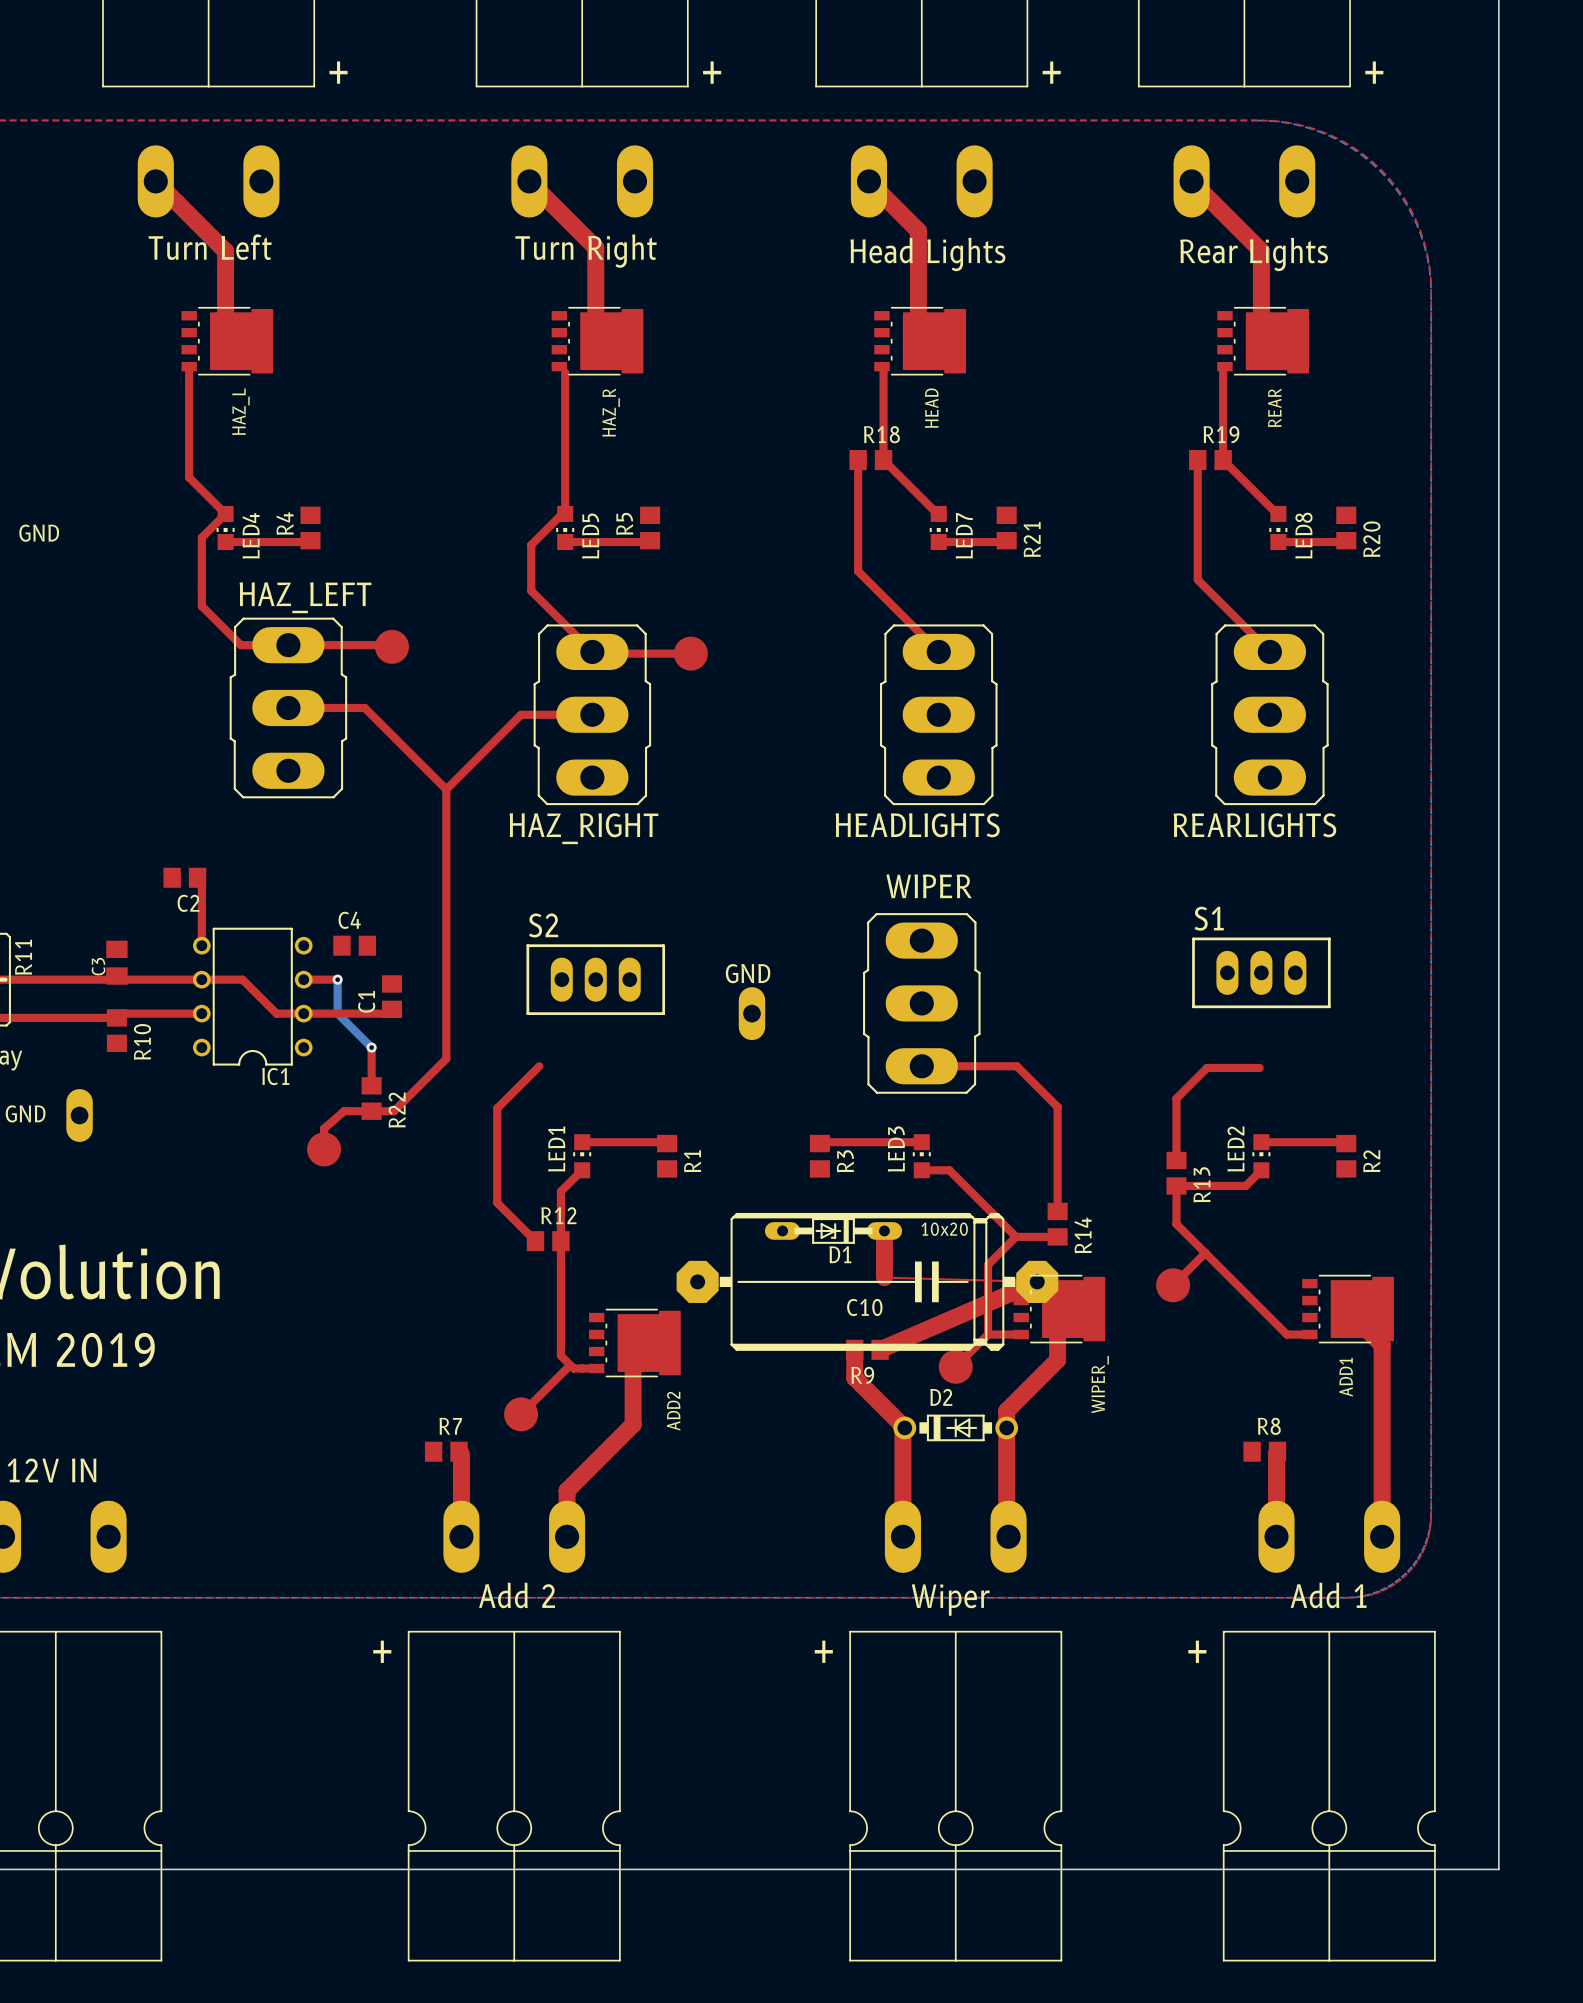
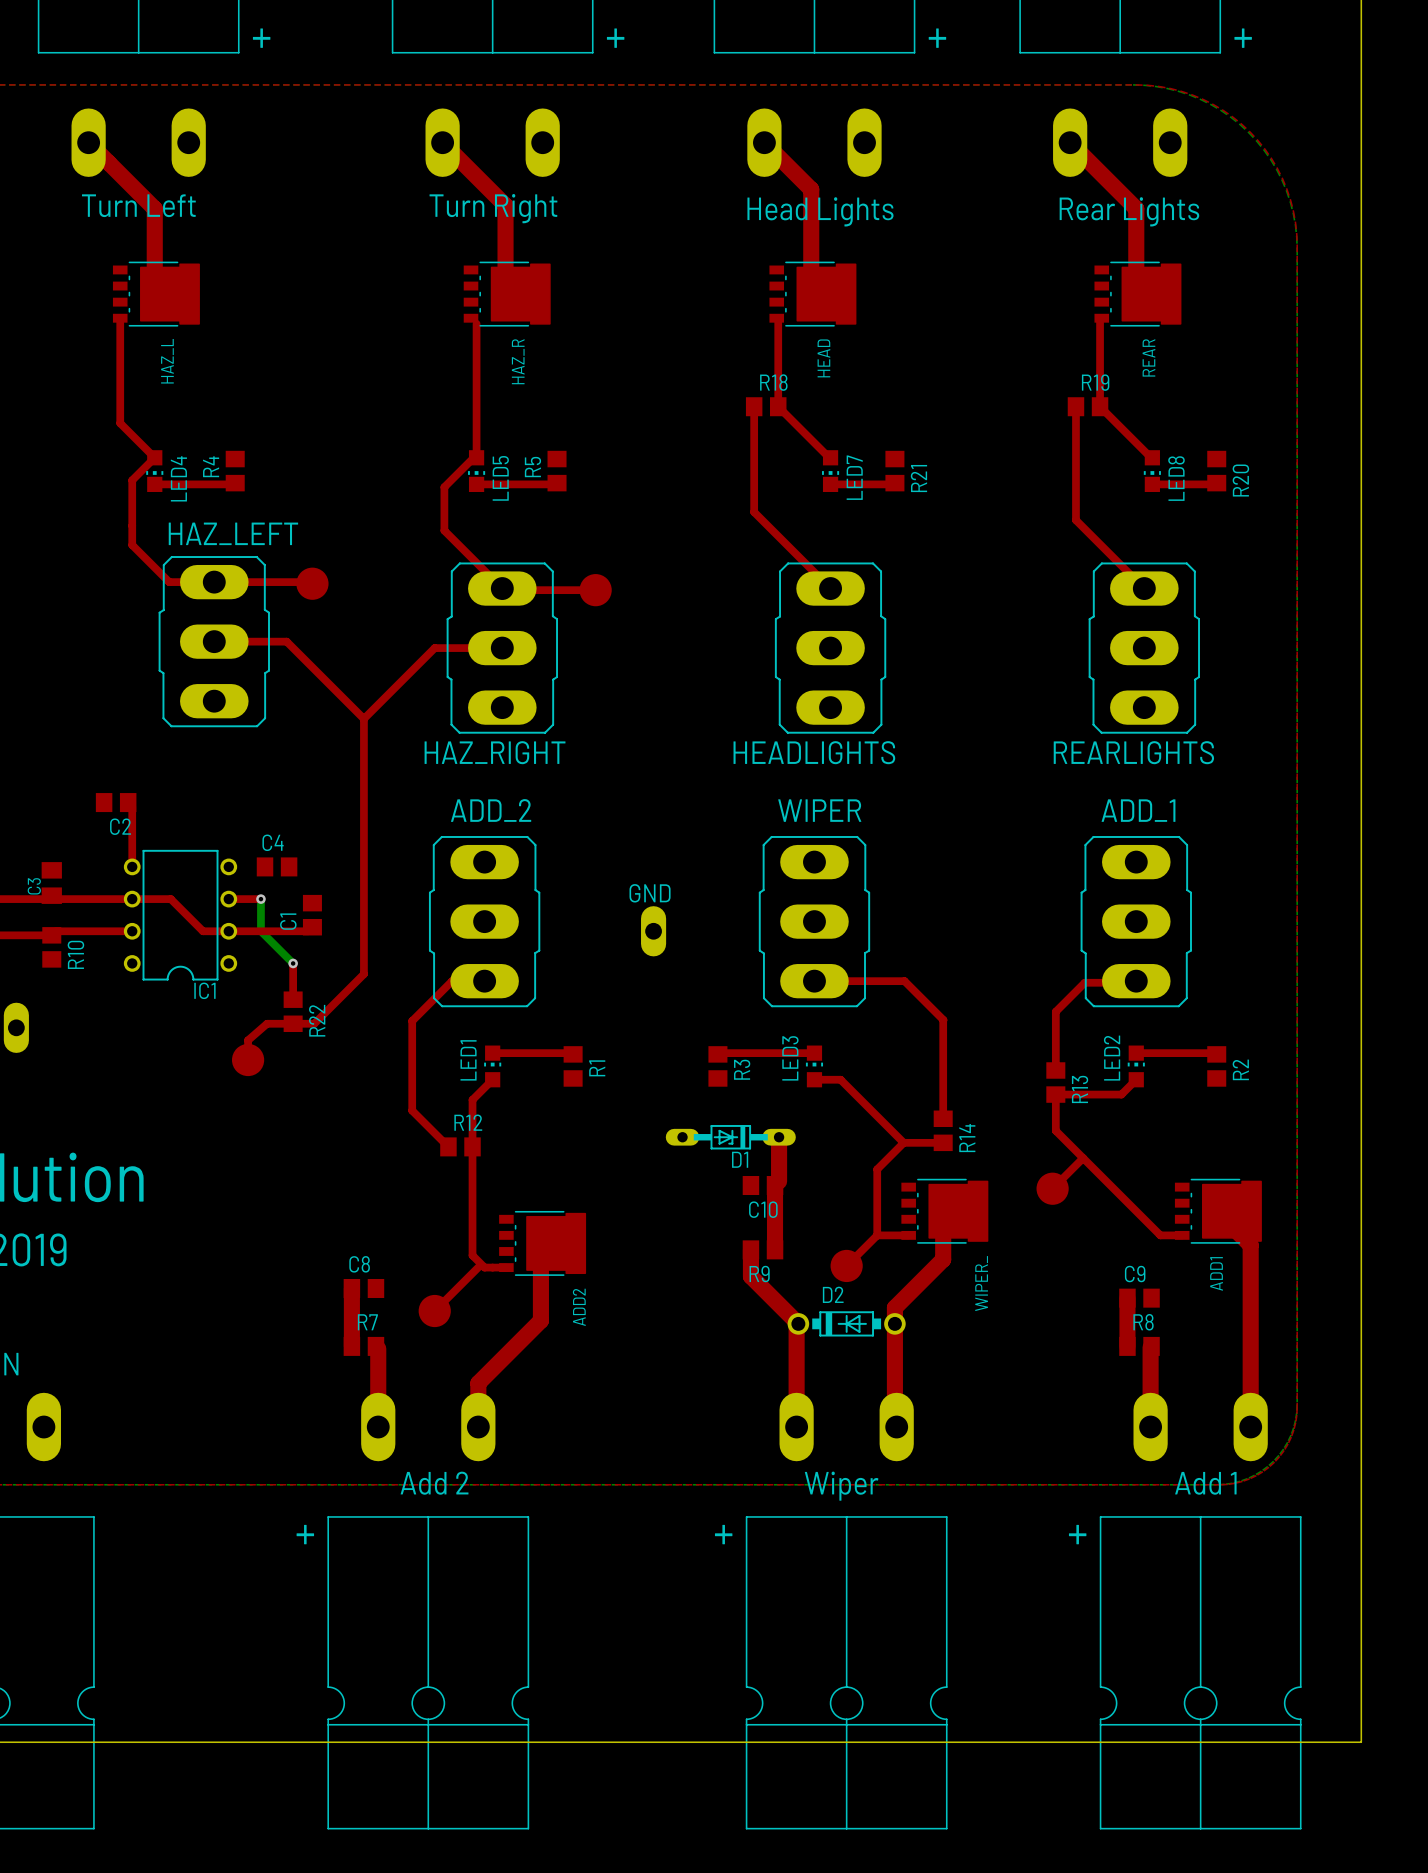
S1: (1261, 972) -> none
S2: (595, 979) -> none
ADD_2: none -> (484, 921)
ADD_1: none -> (1136, 921)
C10 footprint: [676, 1212, 1059, 1351] -> [742, 1176, 784, 1196]
top track: (884, 1277) (1037, 1281) (880, 1349) -> (779, 1181) (775, 1185) (775, 1249)
top track: none -> (351, 1288) (351, 1346)
C8: none -> (363, 1288)
top track: none -> (1127, 1298) (1127, 1346)
C9: none -> (1139, 1298)

